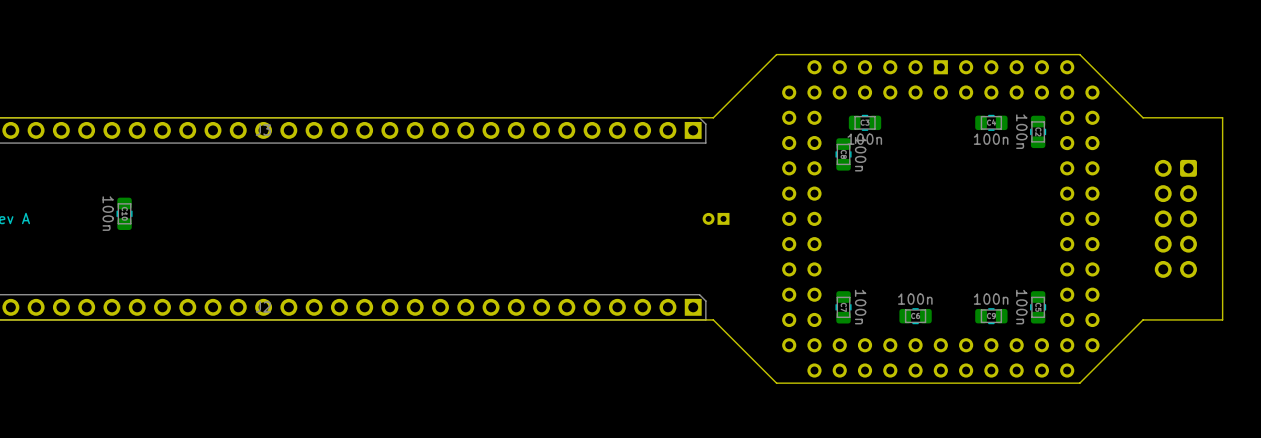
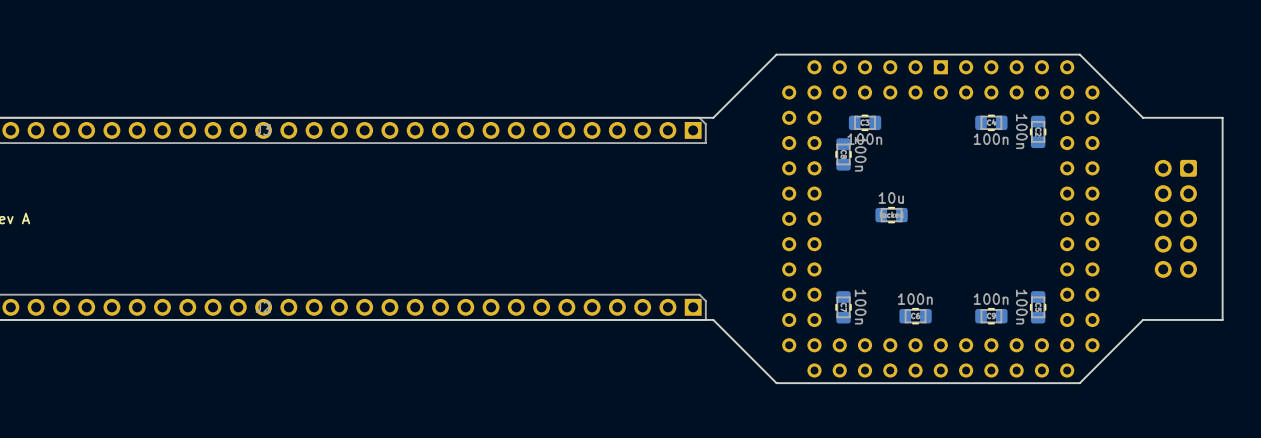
part: 100n (124, 213) -> none
part: none -> 10u (891, 215)
part: (716, 218) -> none

